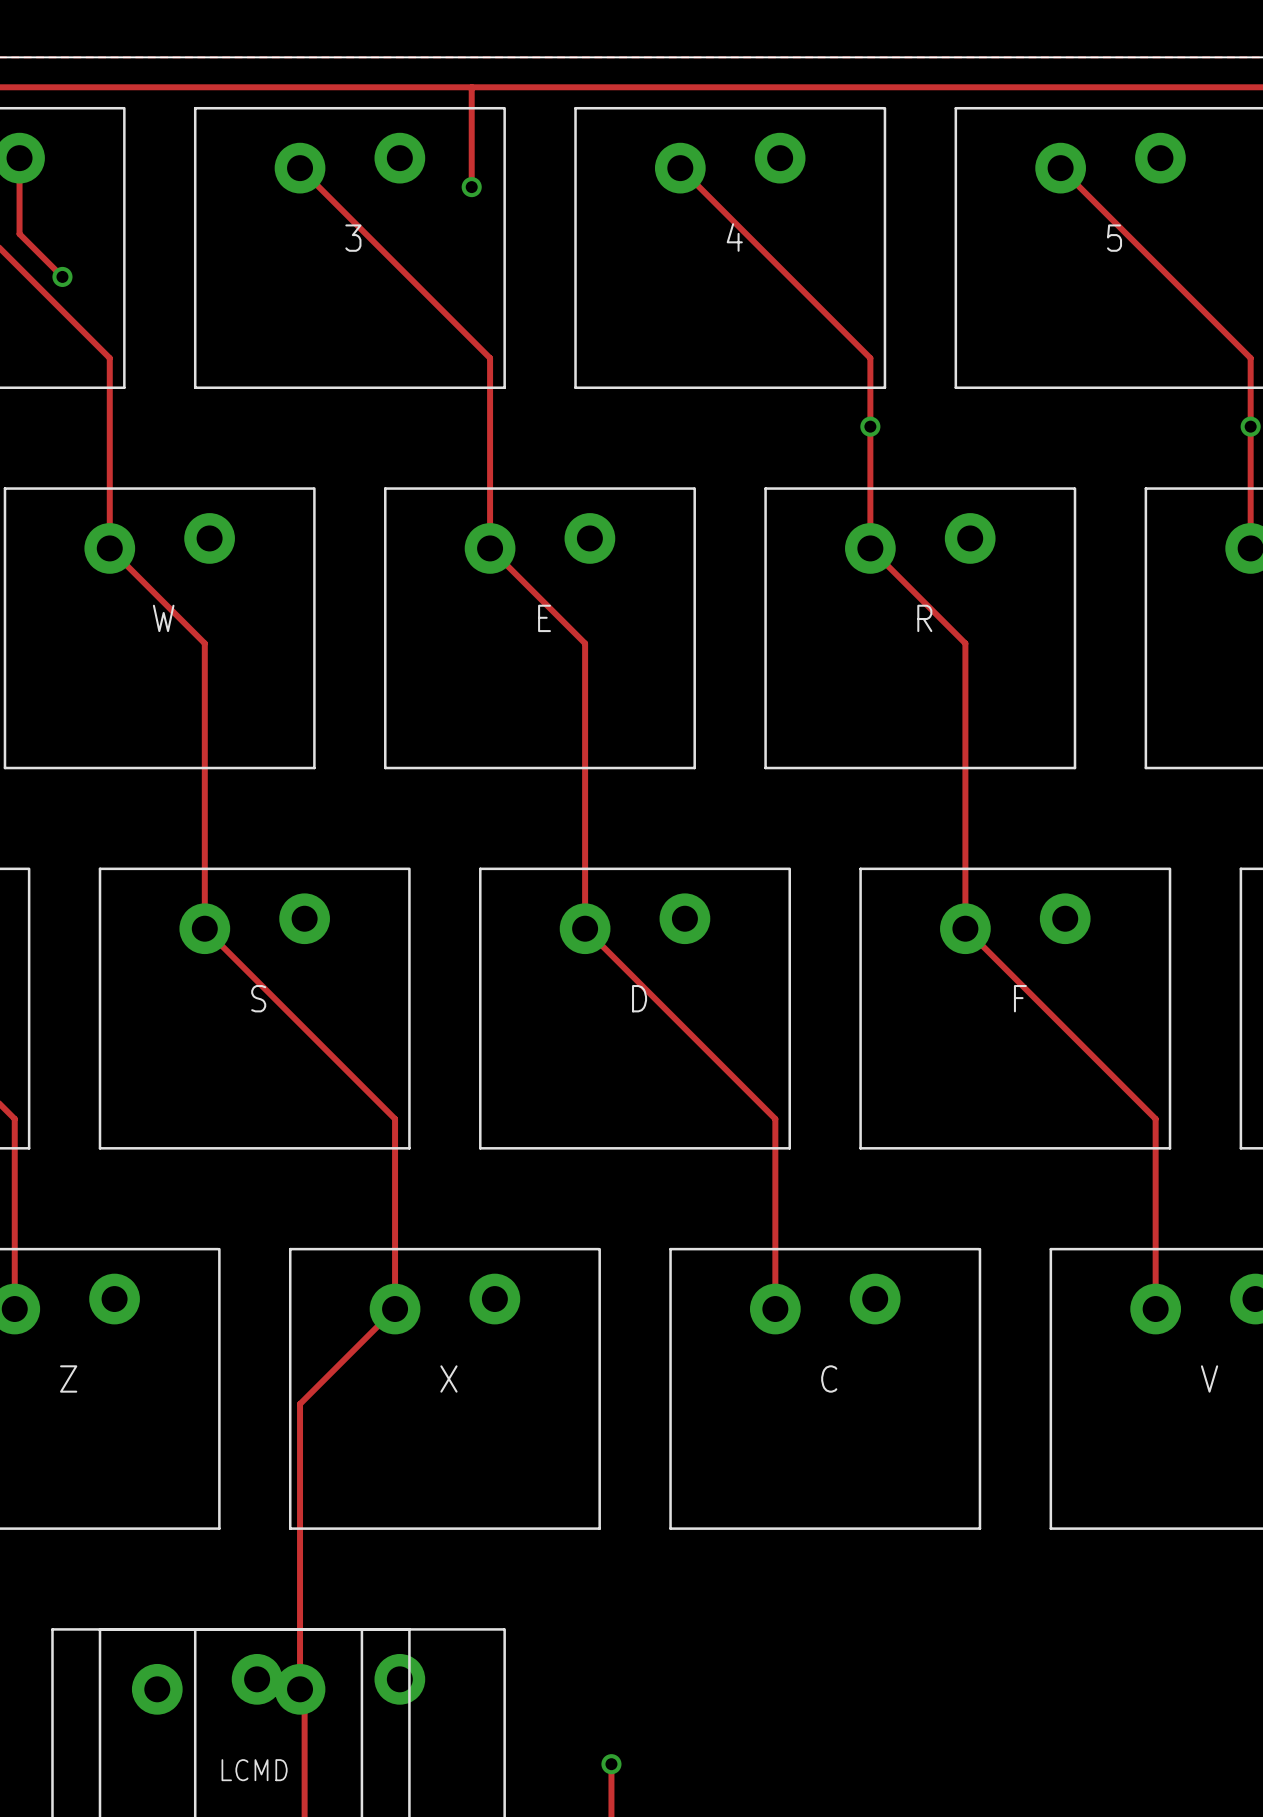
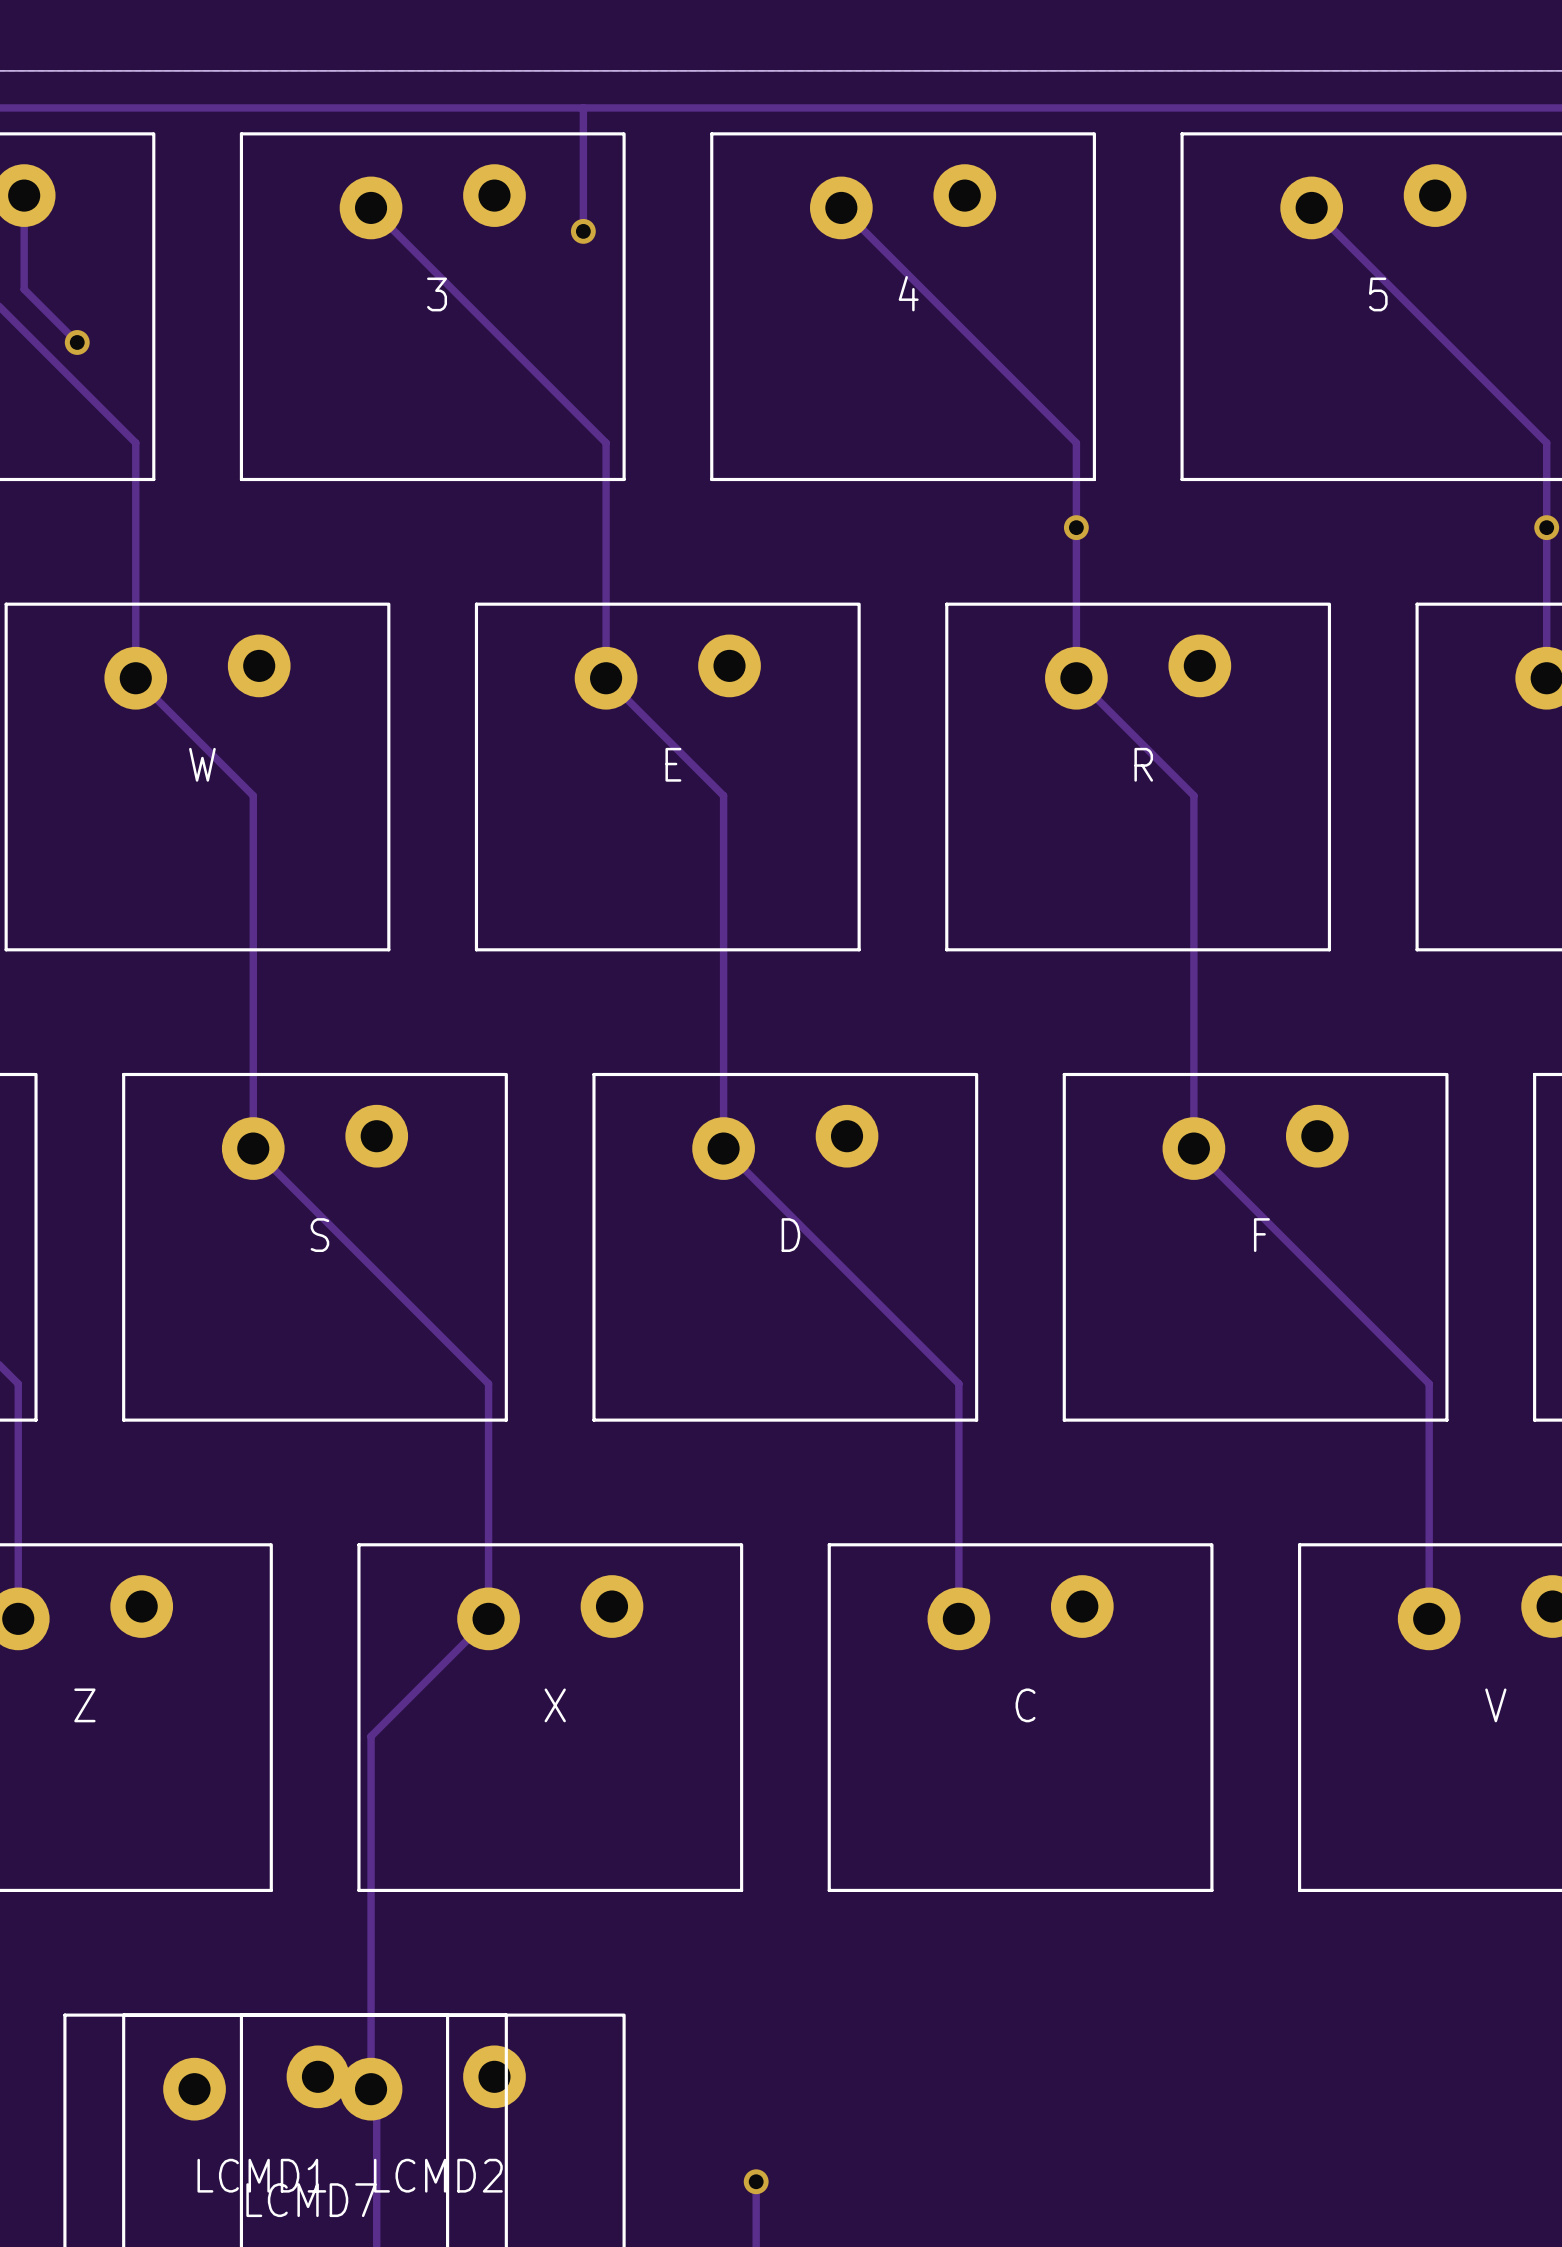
LCMD1 name: none -> LCMD1 (261, 2175)
LCMD2 name: none -> LCMD2 (438, 2175)
text: LCMD (254, 1770) -> none
LCMD7 name: none -> LCMD7 (311, 2200)

